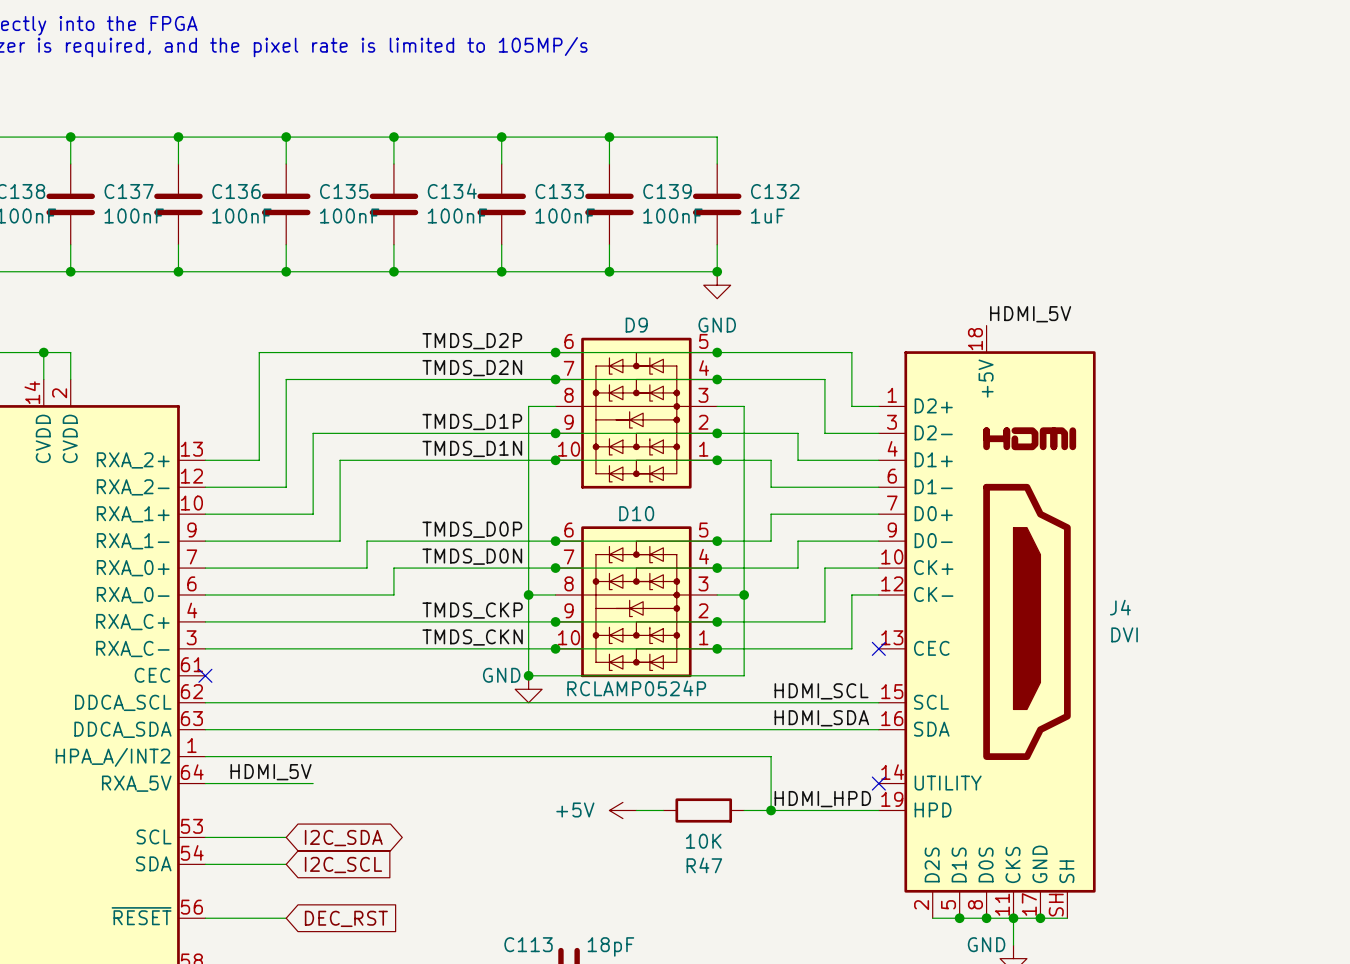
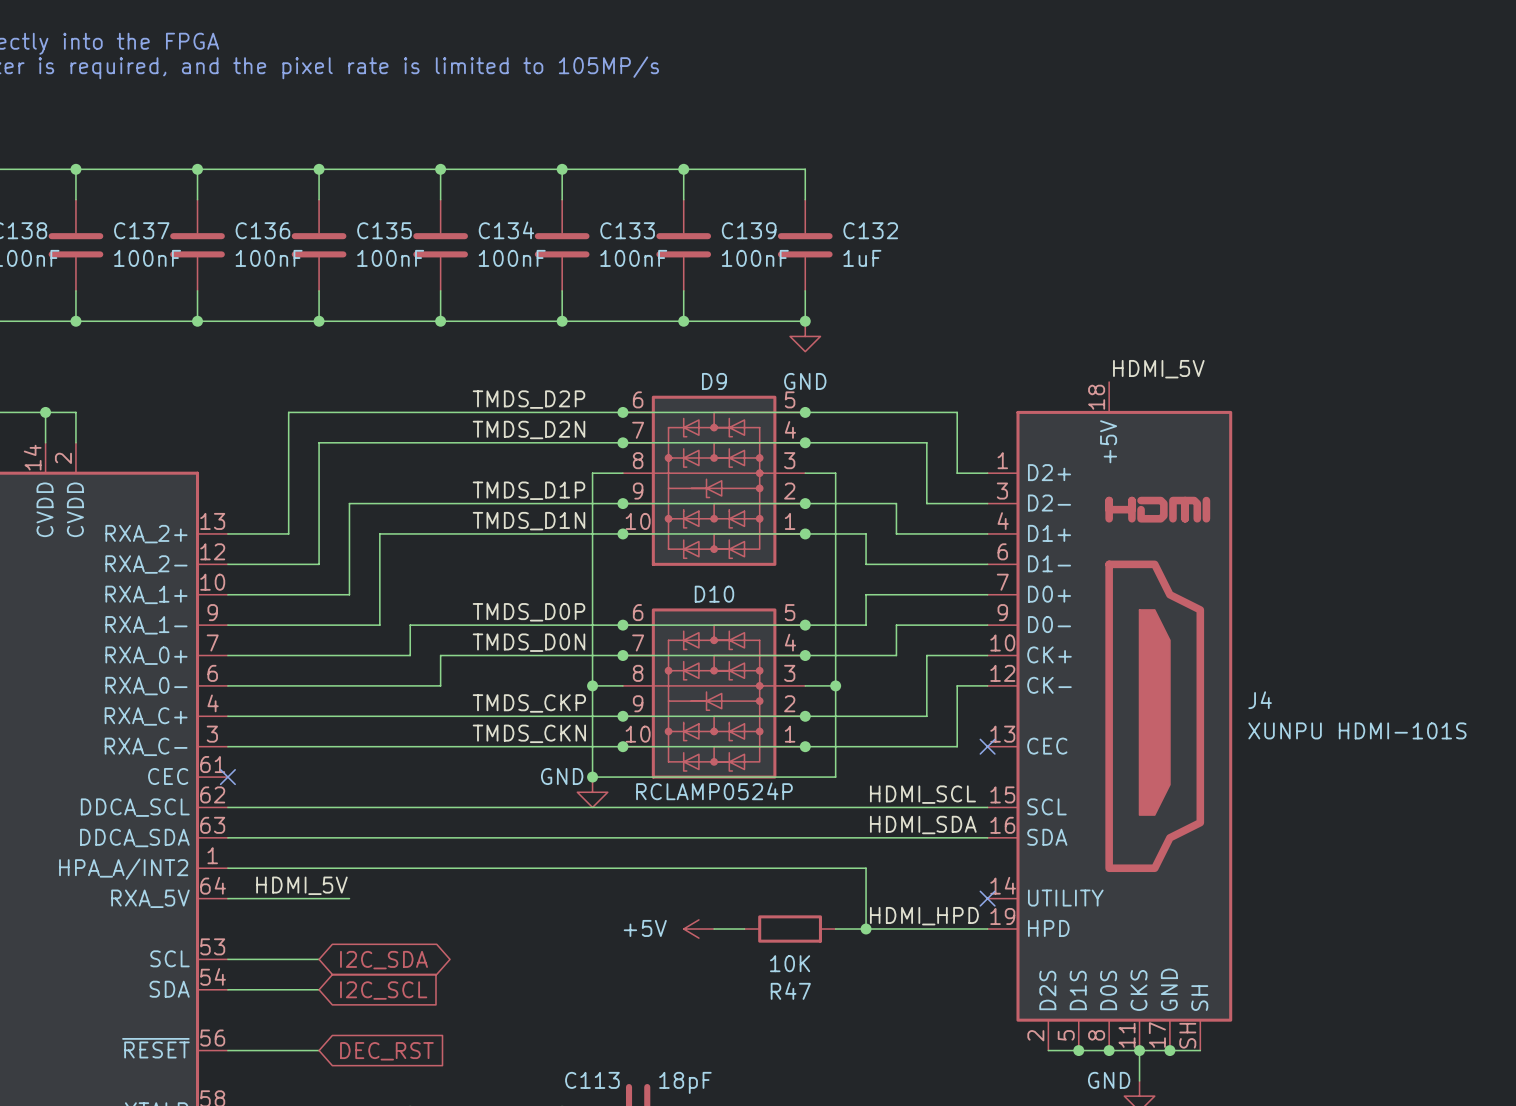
J4 value: DVI (1124, 634) -> XUNPU HDMI-101S (1357, 730)

